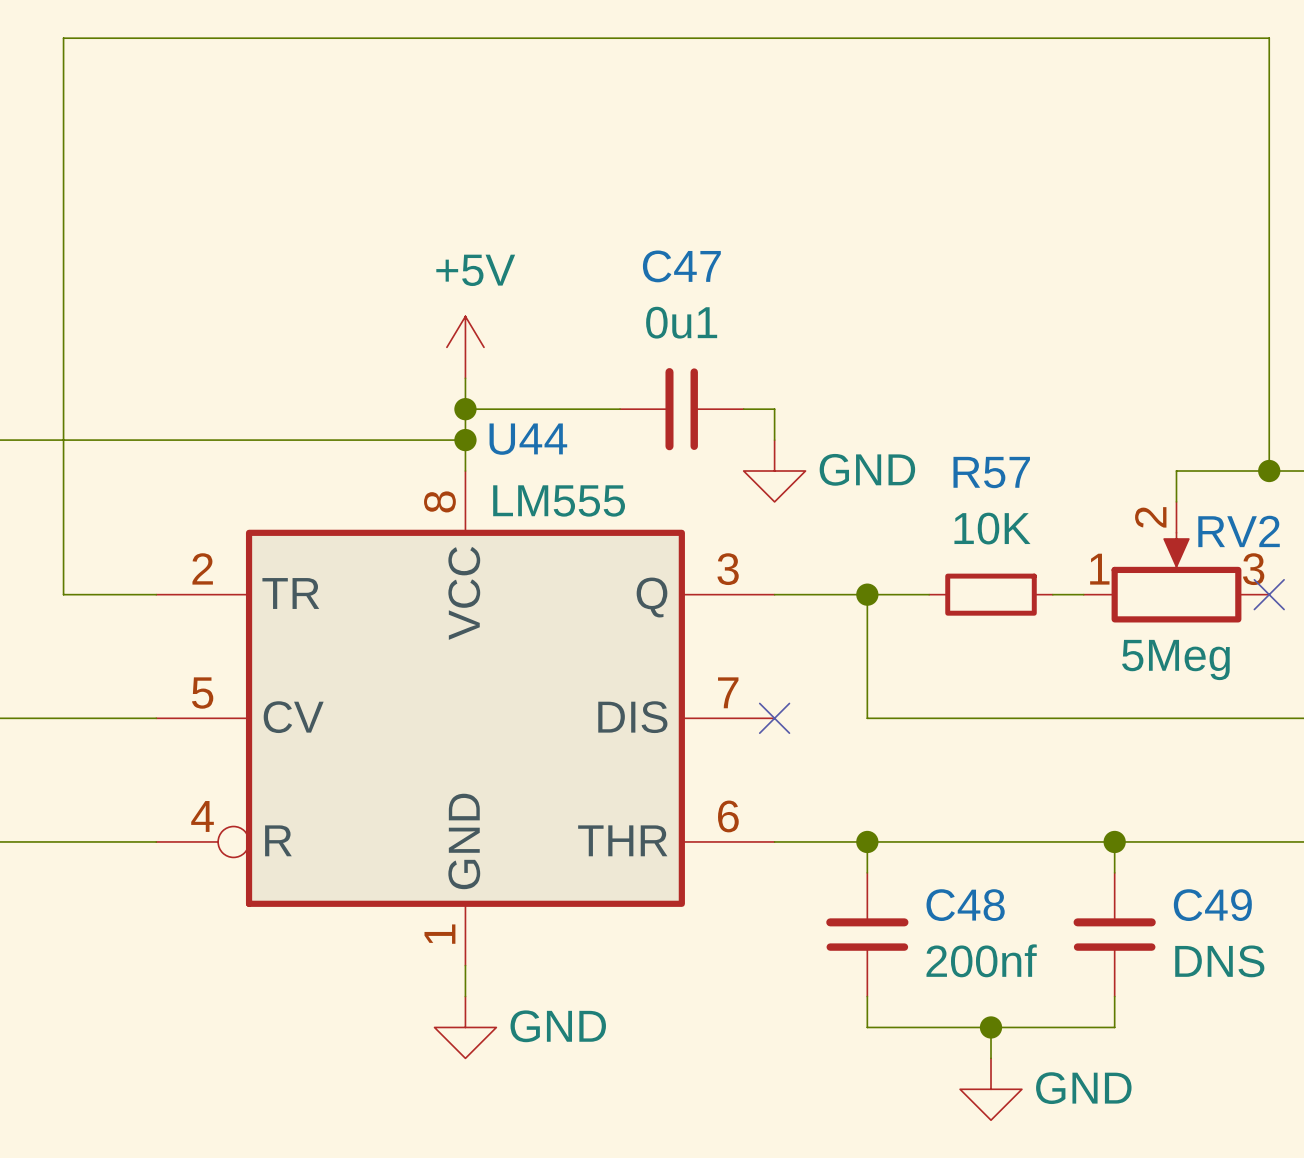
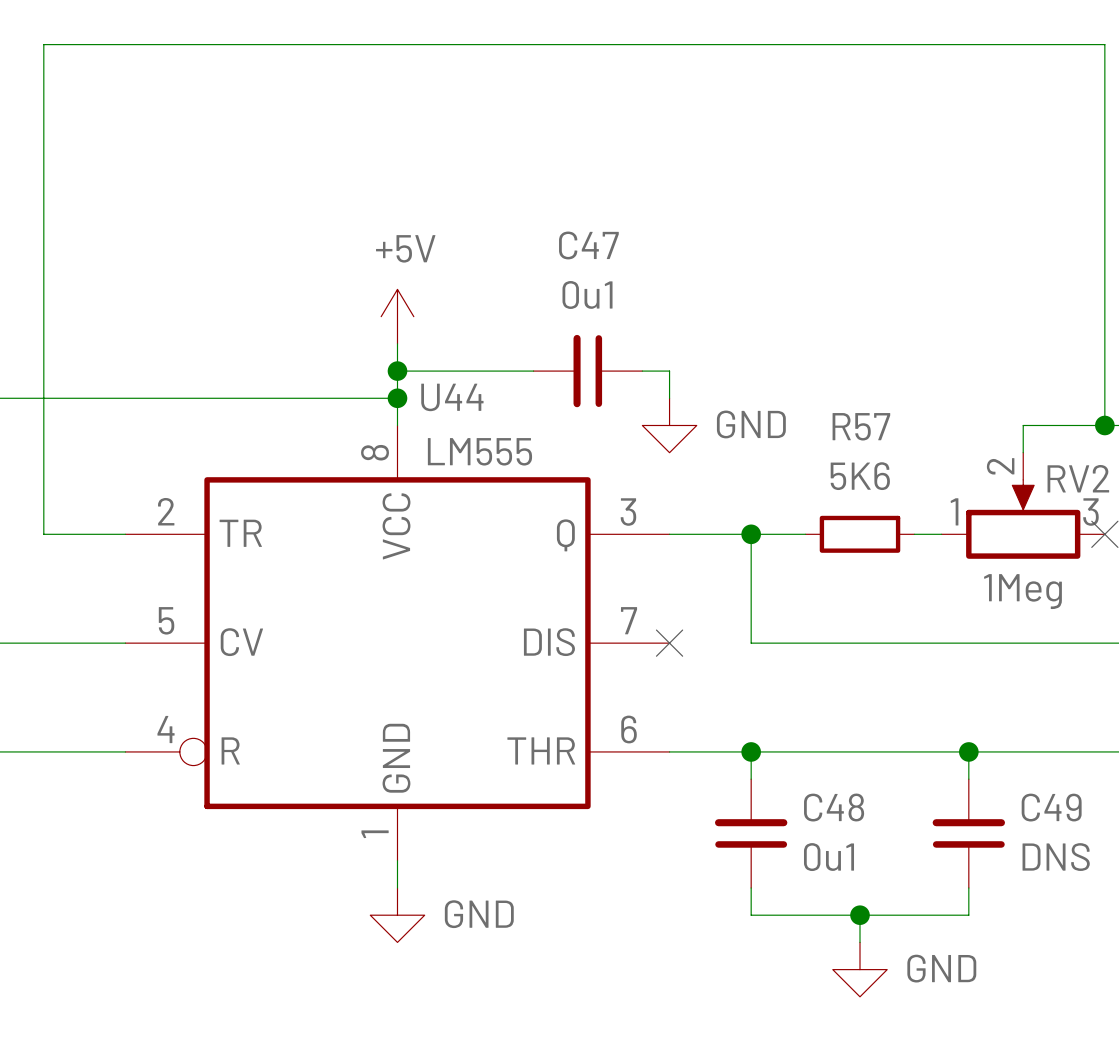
R57 value: 10K (992, 528) -> 5K6 (860, 476)
RV2 value: 5Meg (1175, 659) -> 1Meg (1022, 591)
C48 value: 200nf (981, 960) -> 0u1 (829, 857)

